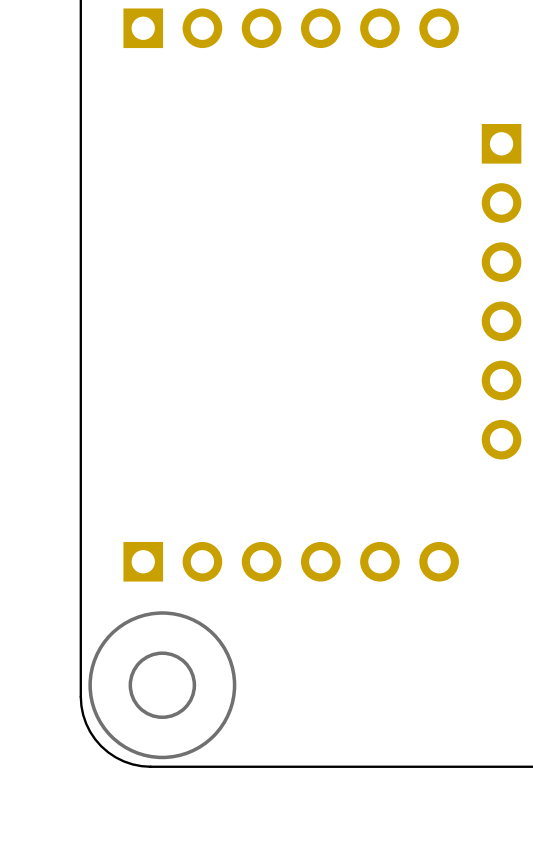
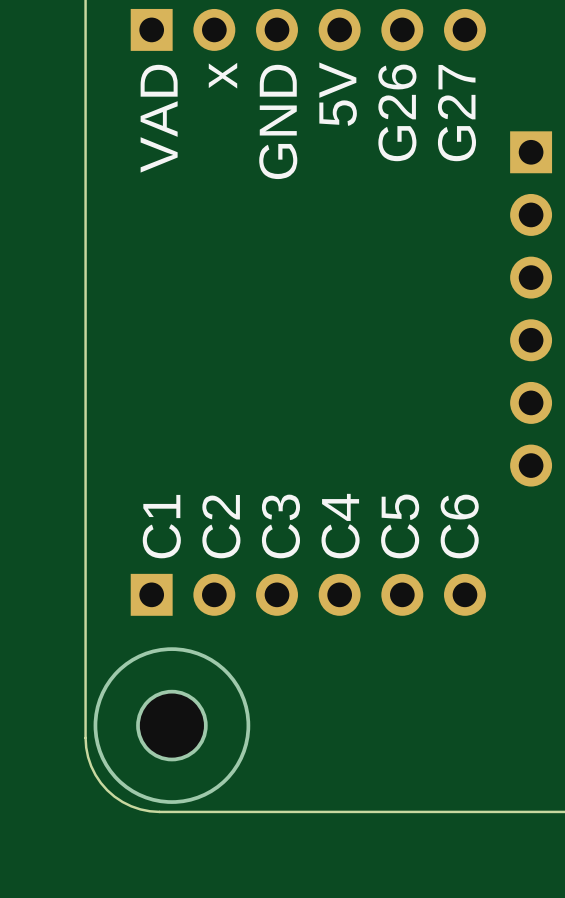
text: none -> x (222, 75)
text: none -> 5V (338, 94)
text: none -> VAD (159, 118)
text: none -> G27 (456, 113)
text: none -> G26 (397, 112)
text: none -> GND (278, 121)
text: none -> C4 (340, 526)
text: none -> C1 (161, 526)
text: none -> C2 (221, 526)
text: none -> C3 (280, 526)
text: none -> C5 (400, 526)
text: none -> C6 (459, 526)

